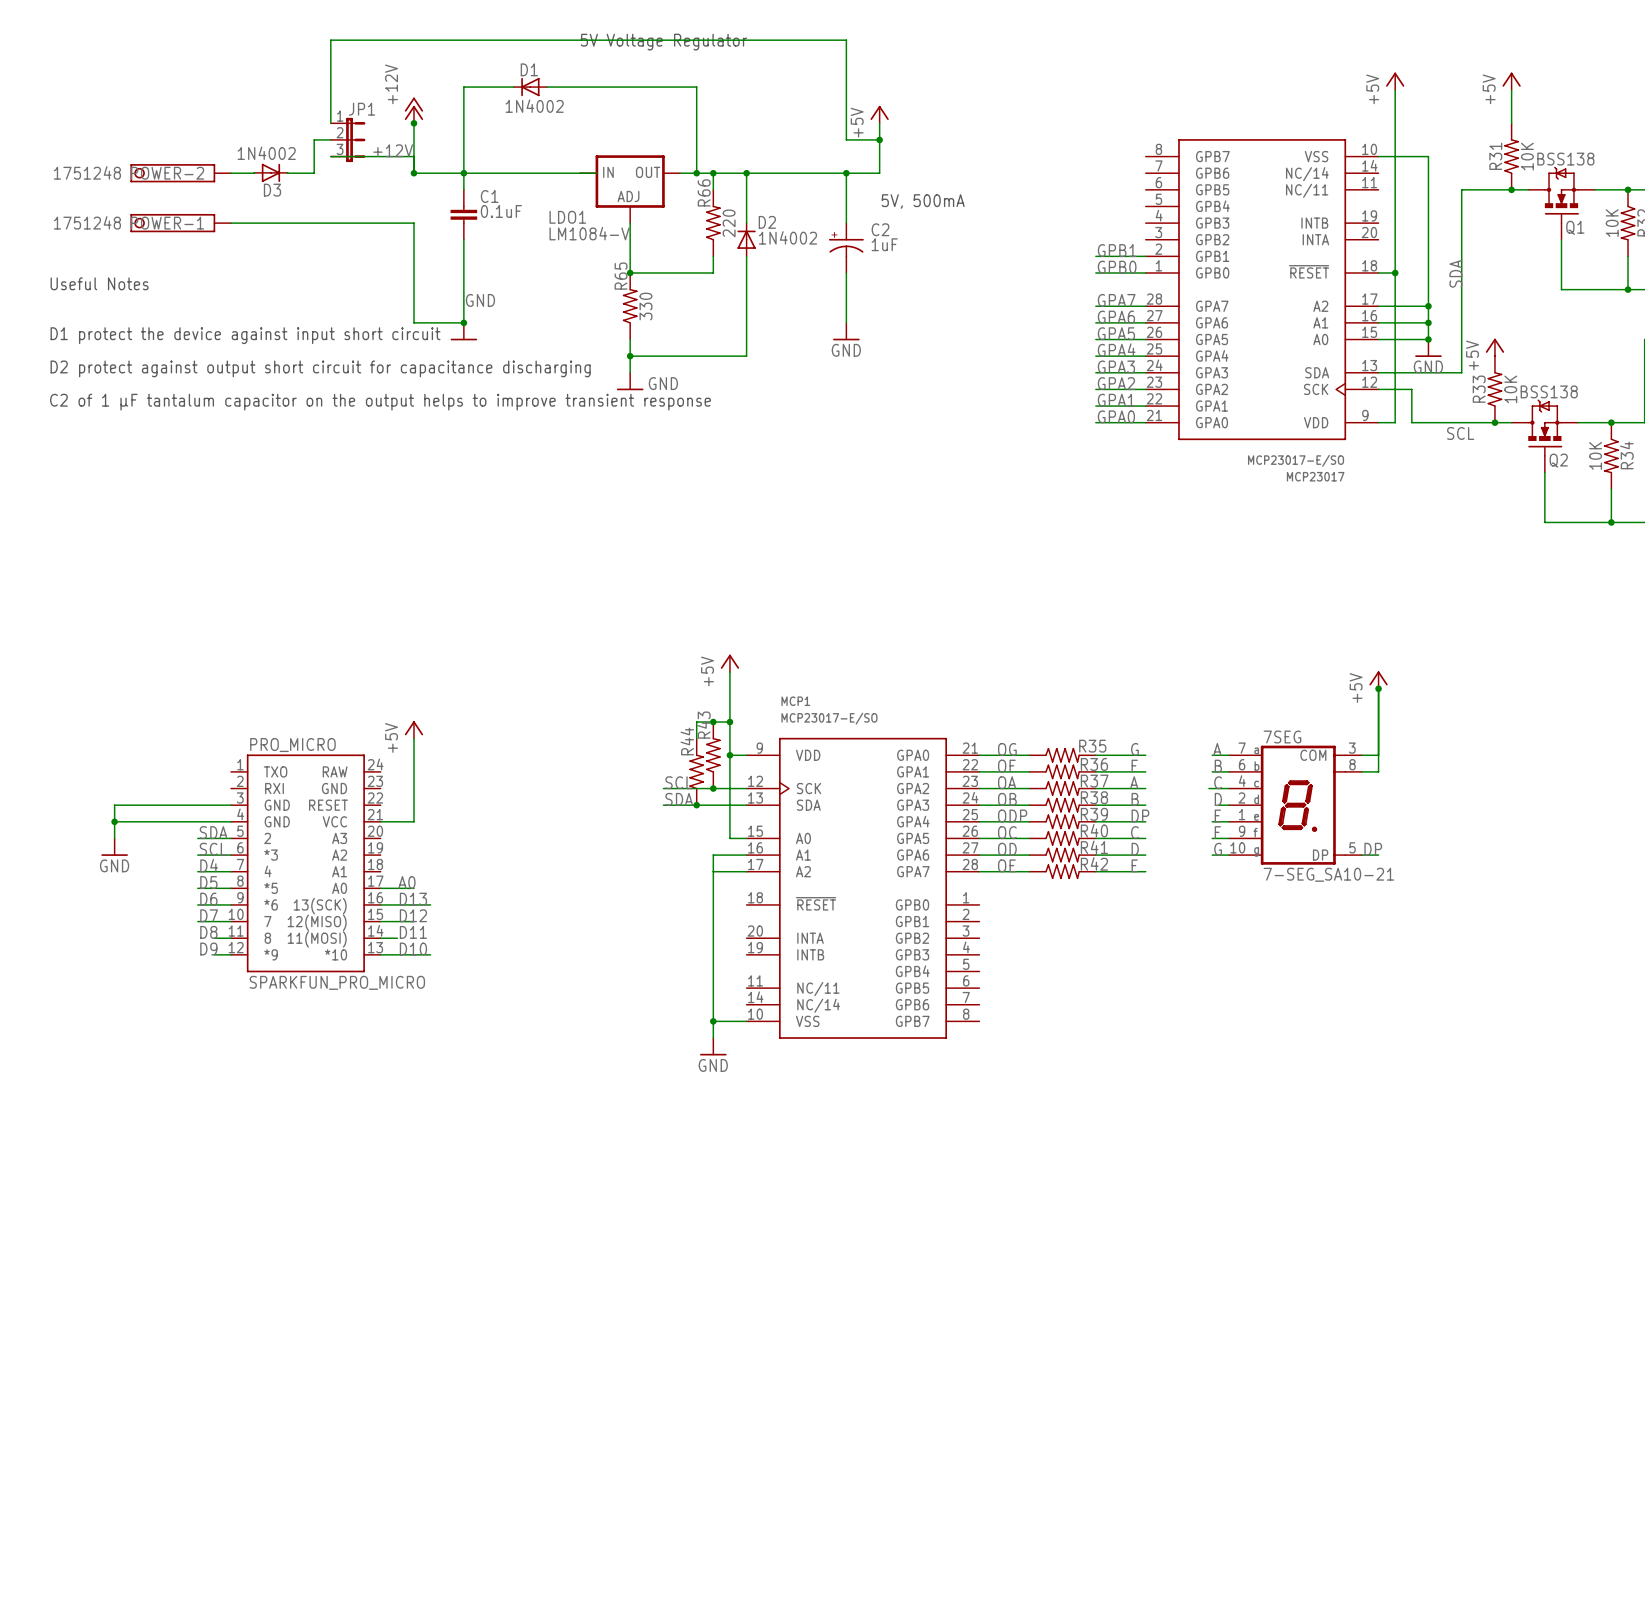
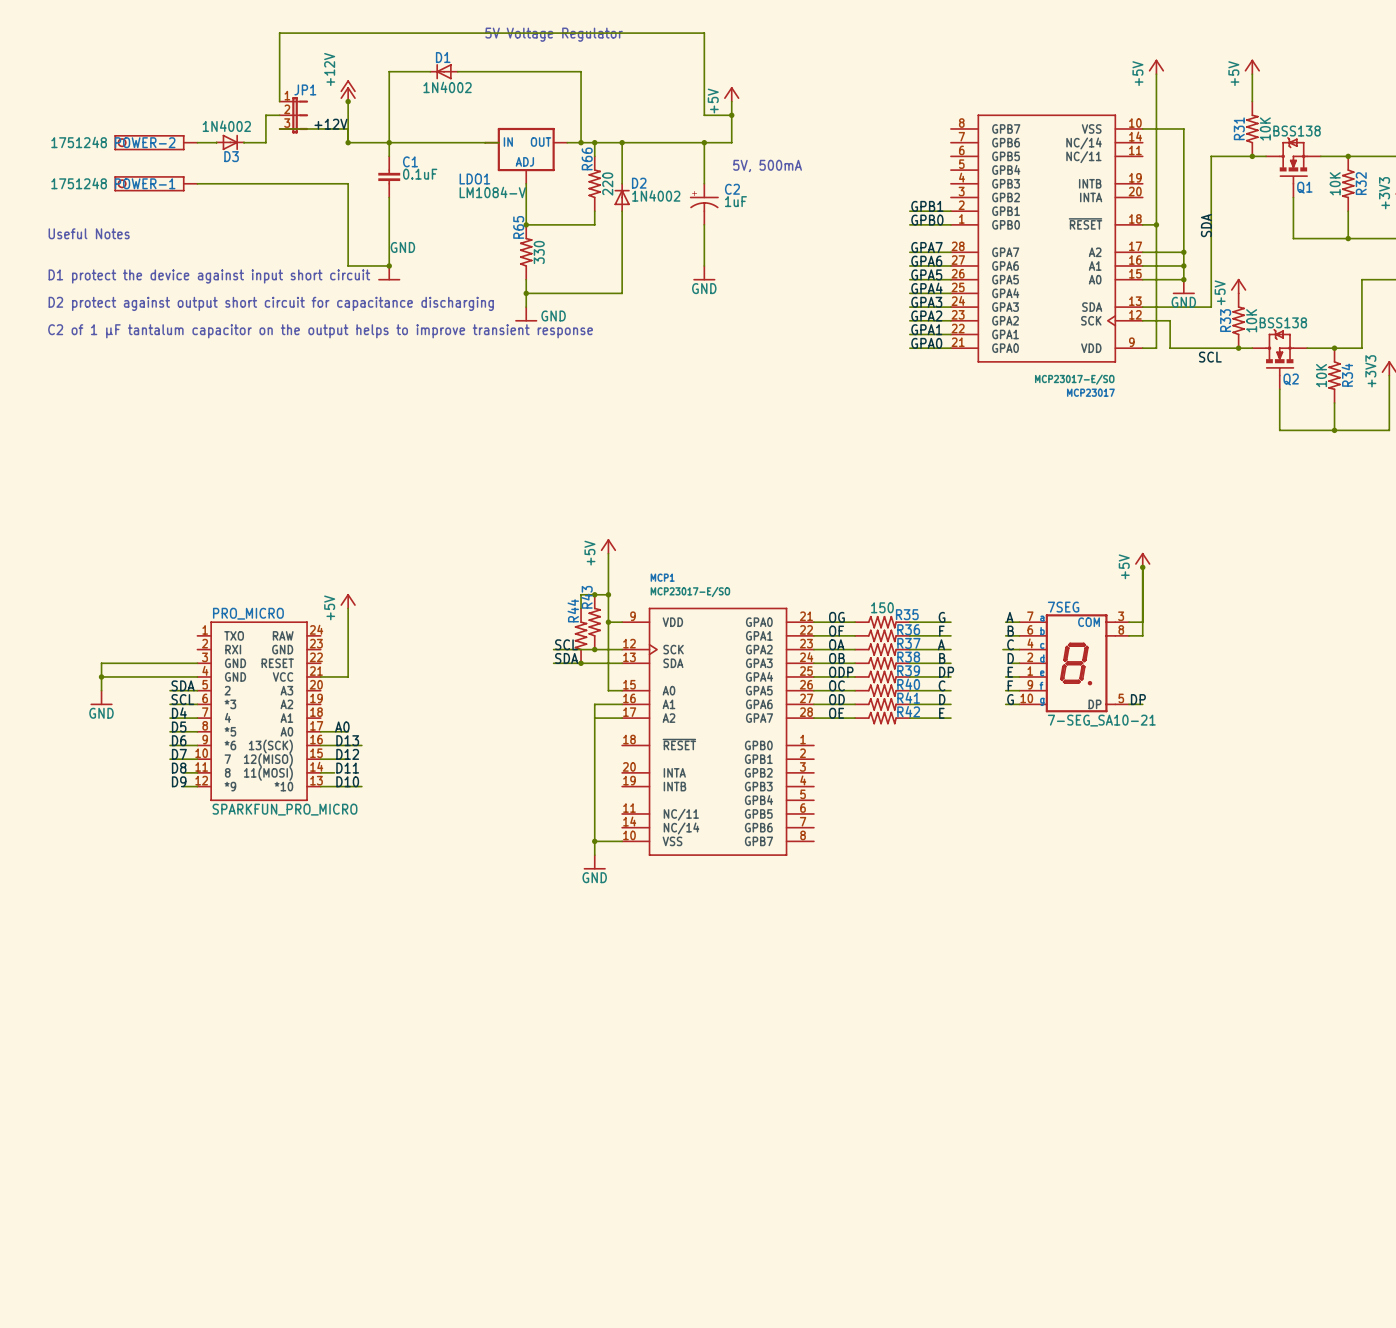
R35 value: none -> 150 (882, 607)

